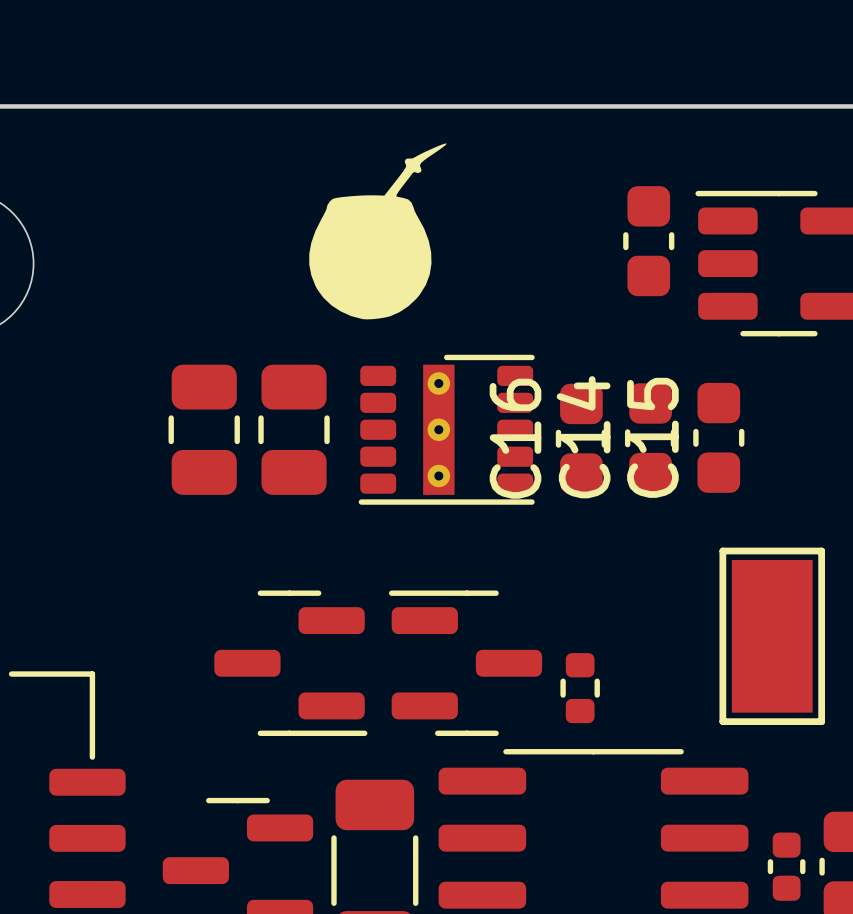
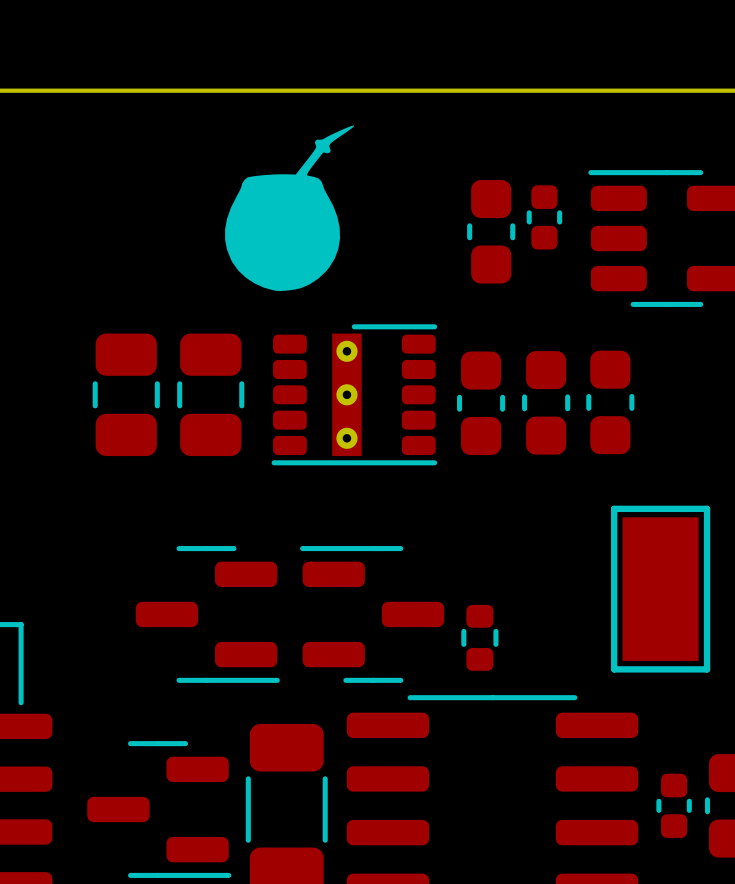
part footprint: [623, 186, 675, 297] -> [526, 185, 563, 250]
part: none -> (491, 231)
C14 name: C14 (583, 437) -> none
C15 name: C15 (652, 437) -> none
C16 name: C16 (515, 438) -> none

